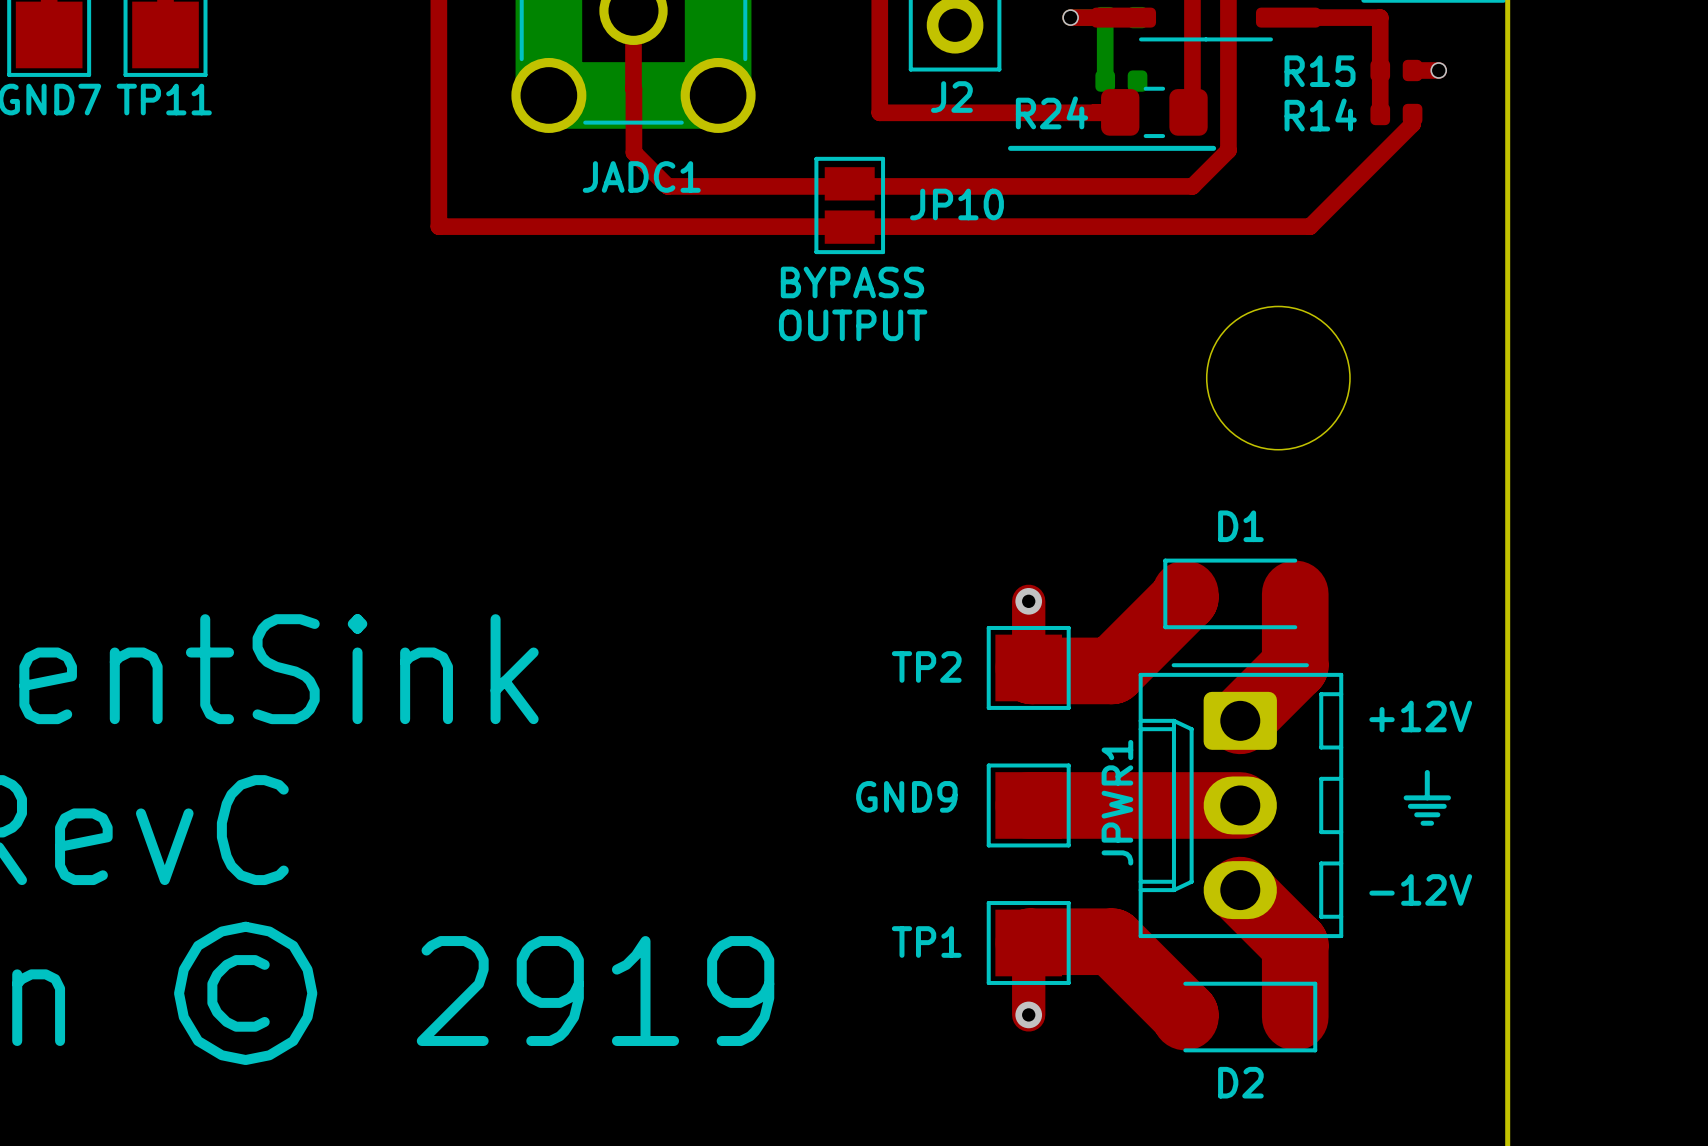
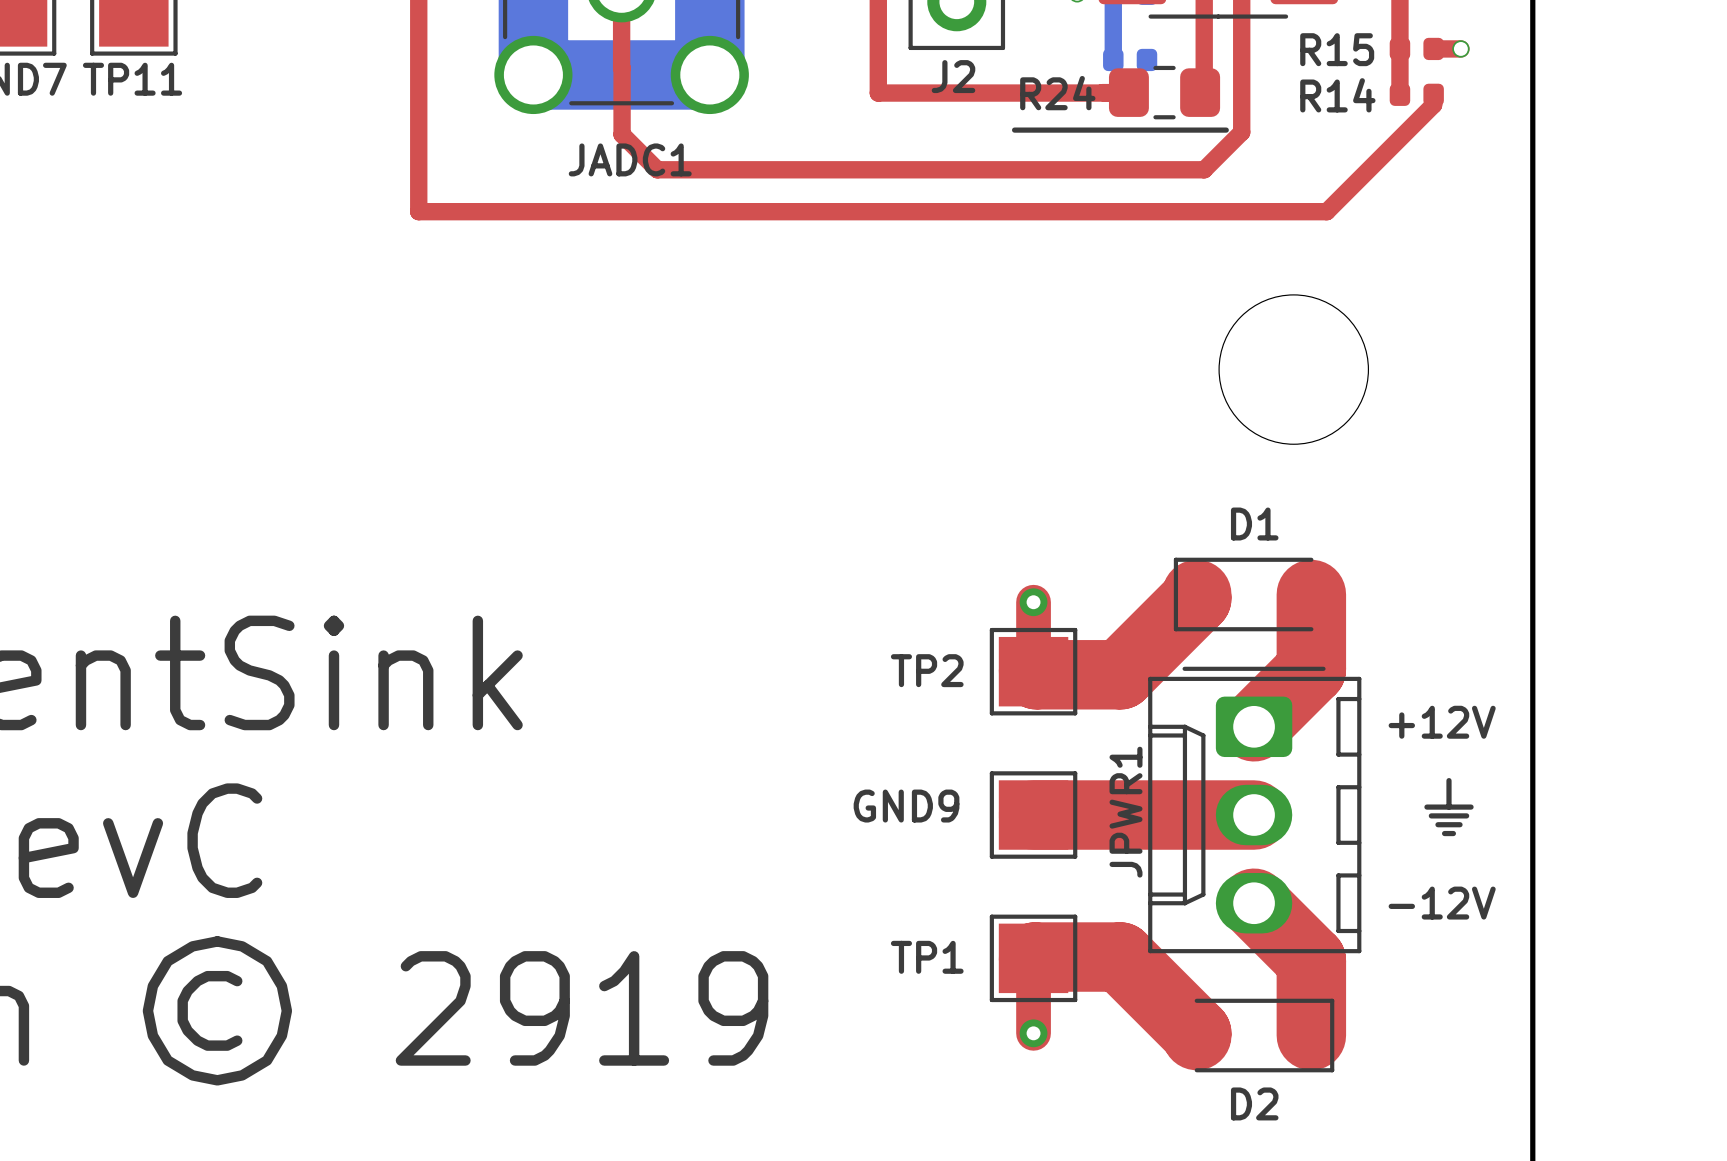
JP10: (849, 205) -> none
text: BYPASS (852, 282) -> none
text: OUTPUT (853, 325) -> none

